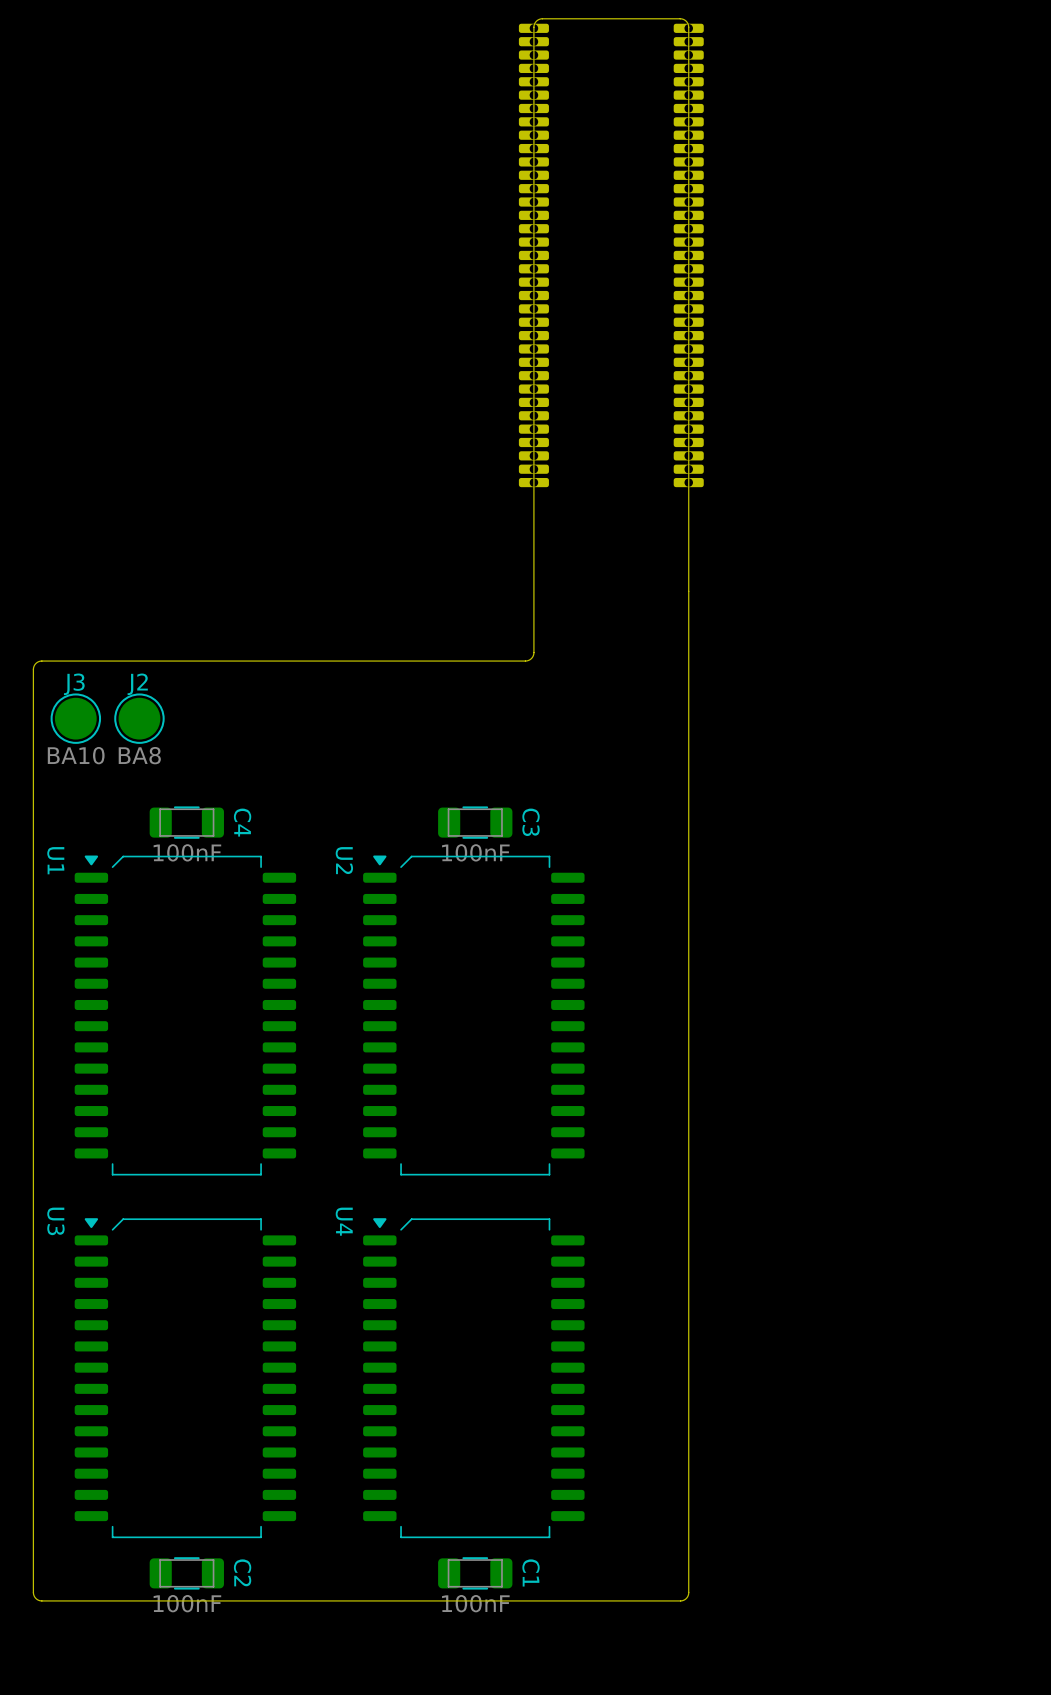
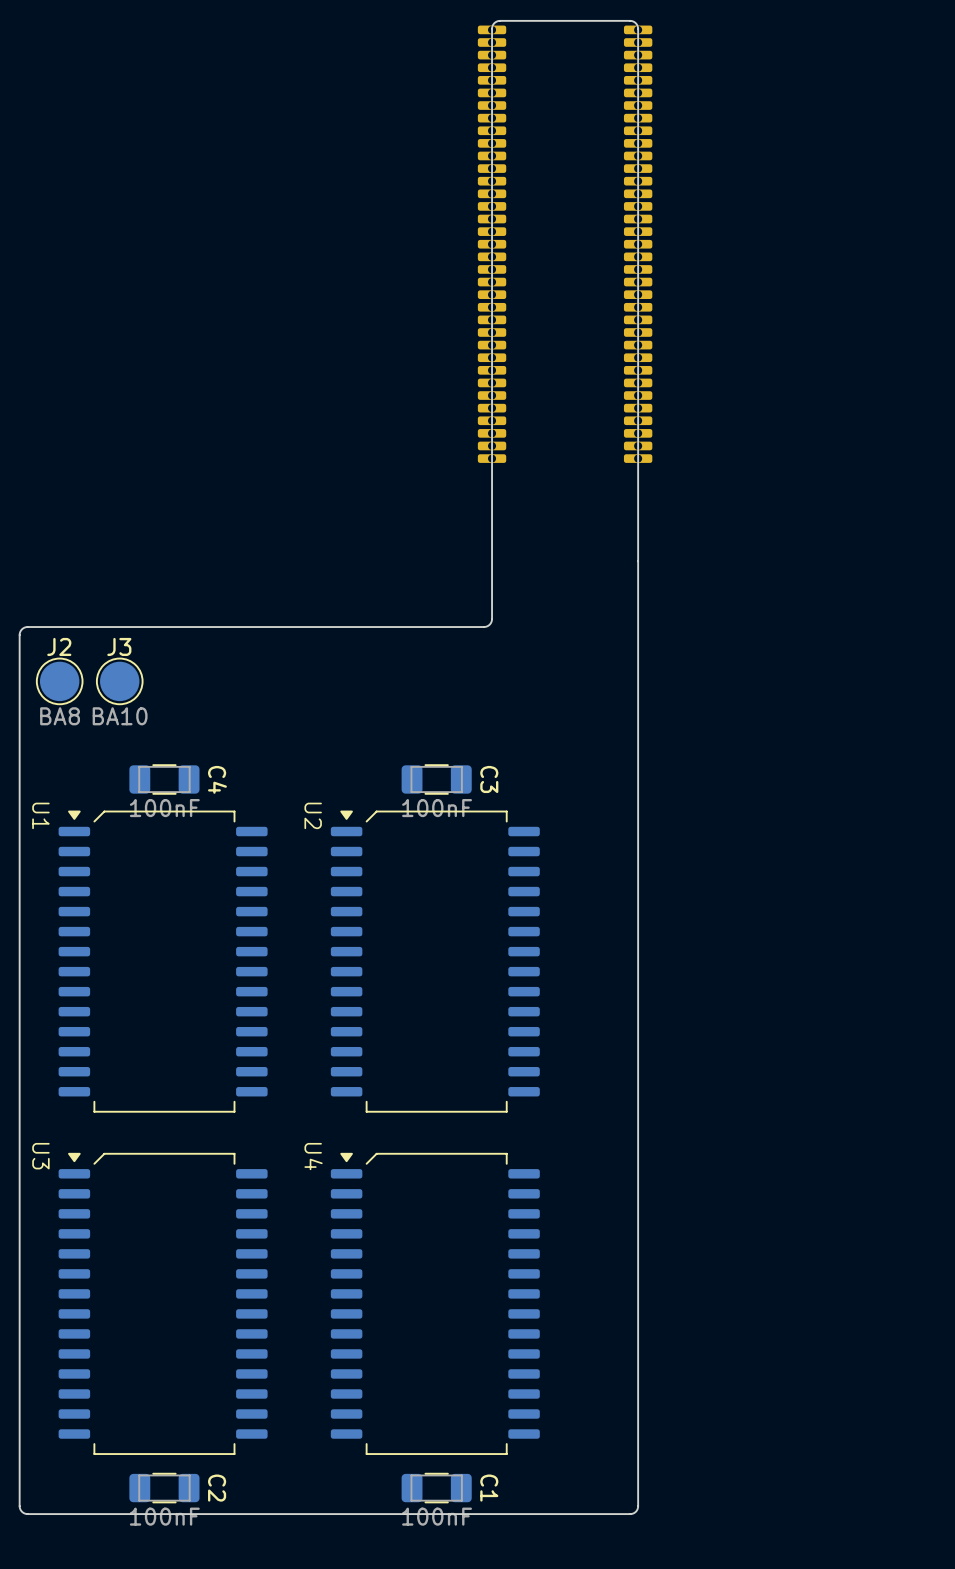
J3 name: J3 (74, 684) -> J2 (59, 646)
J2 name: J2 (137, 684) -> J3 (119, 646)
J3 value: BA10 (76, 755) -> BA8 (60, 716)
J2 value: BA8 (139, 755) -> BA10 (120, 716)

